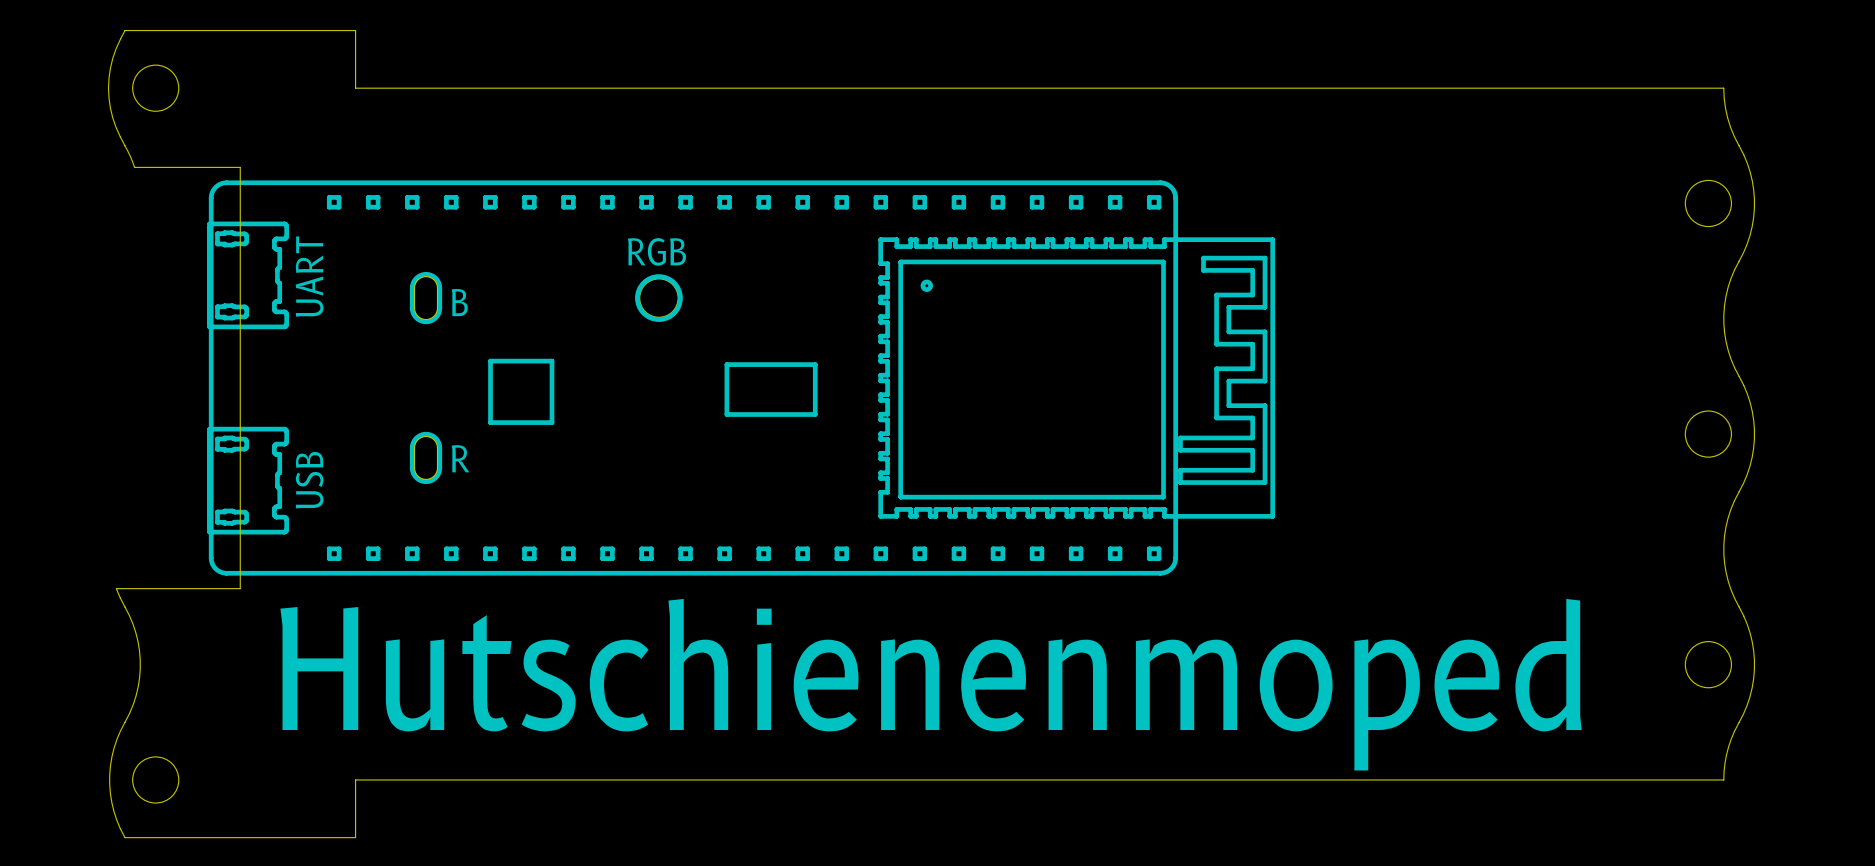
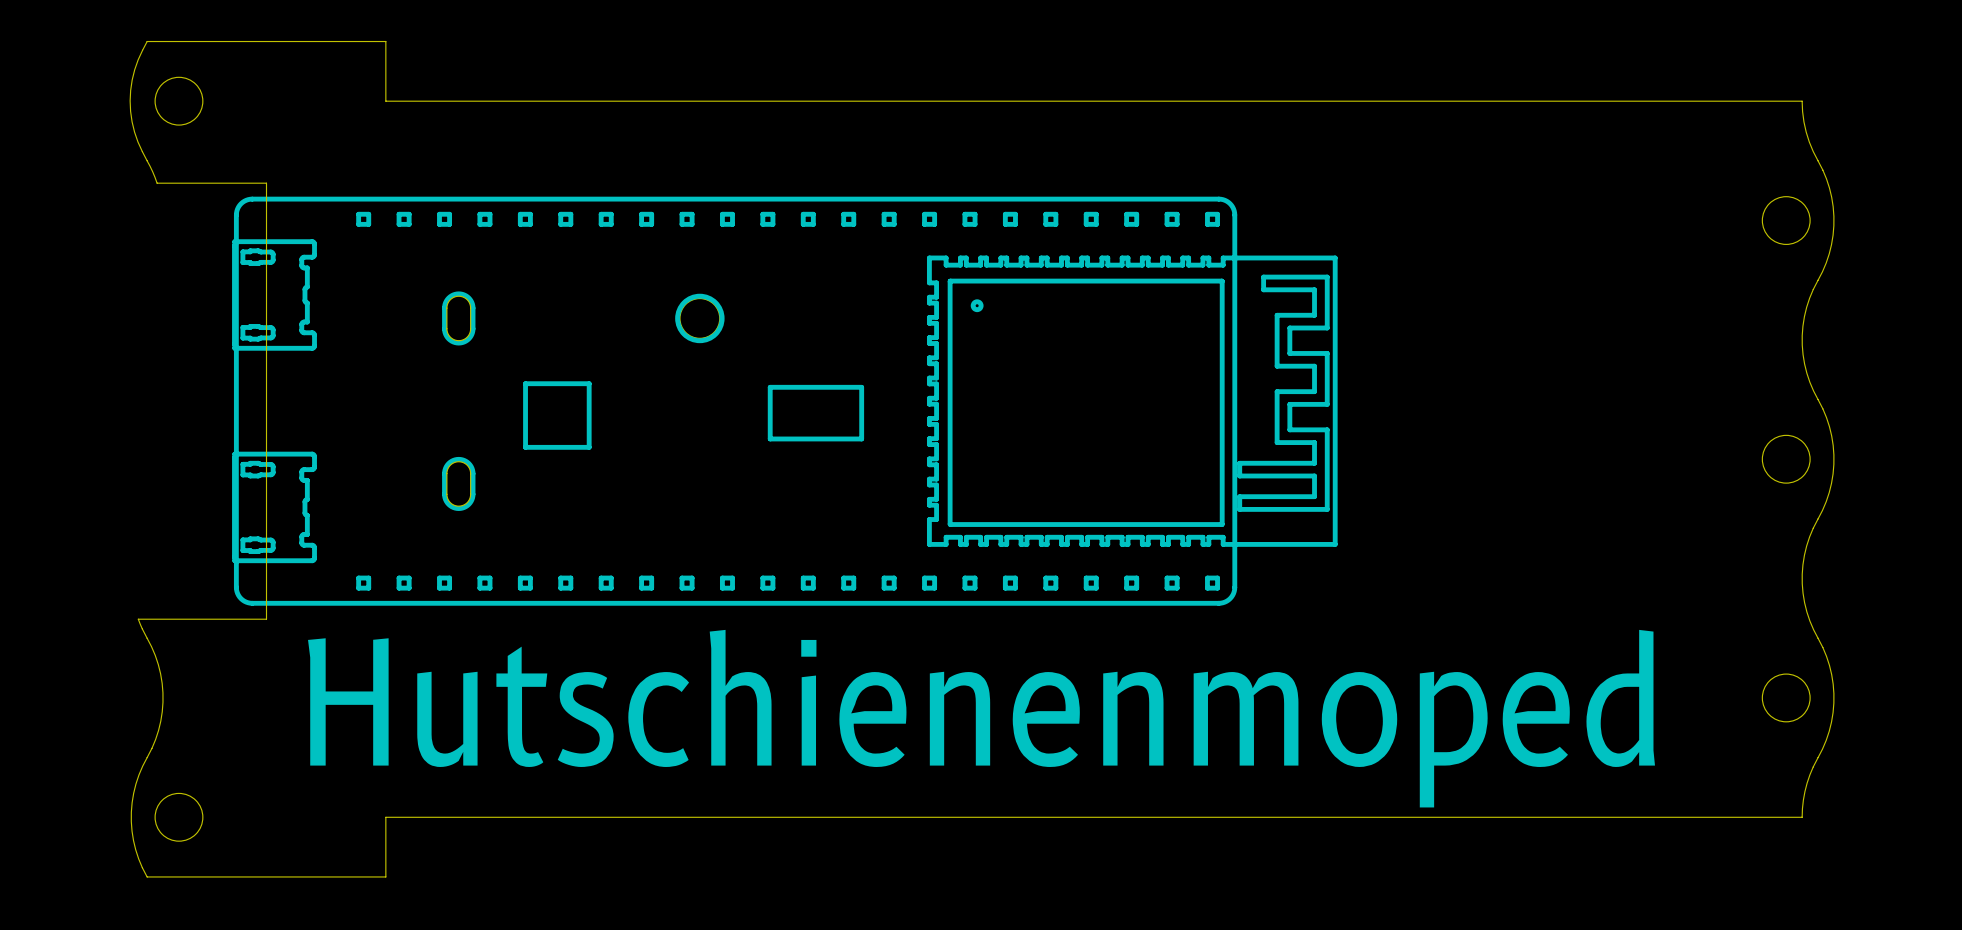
text: RGB (656, 251) -> none
text: UART (309, 276) -> none
text: B (459, 302) -> none
text: R (460, 458) -> none
text: USB (309, 480) -> none

